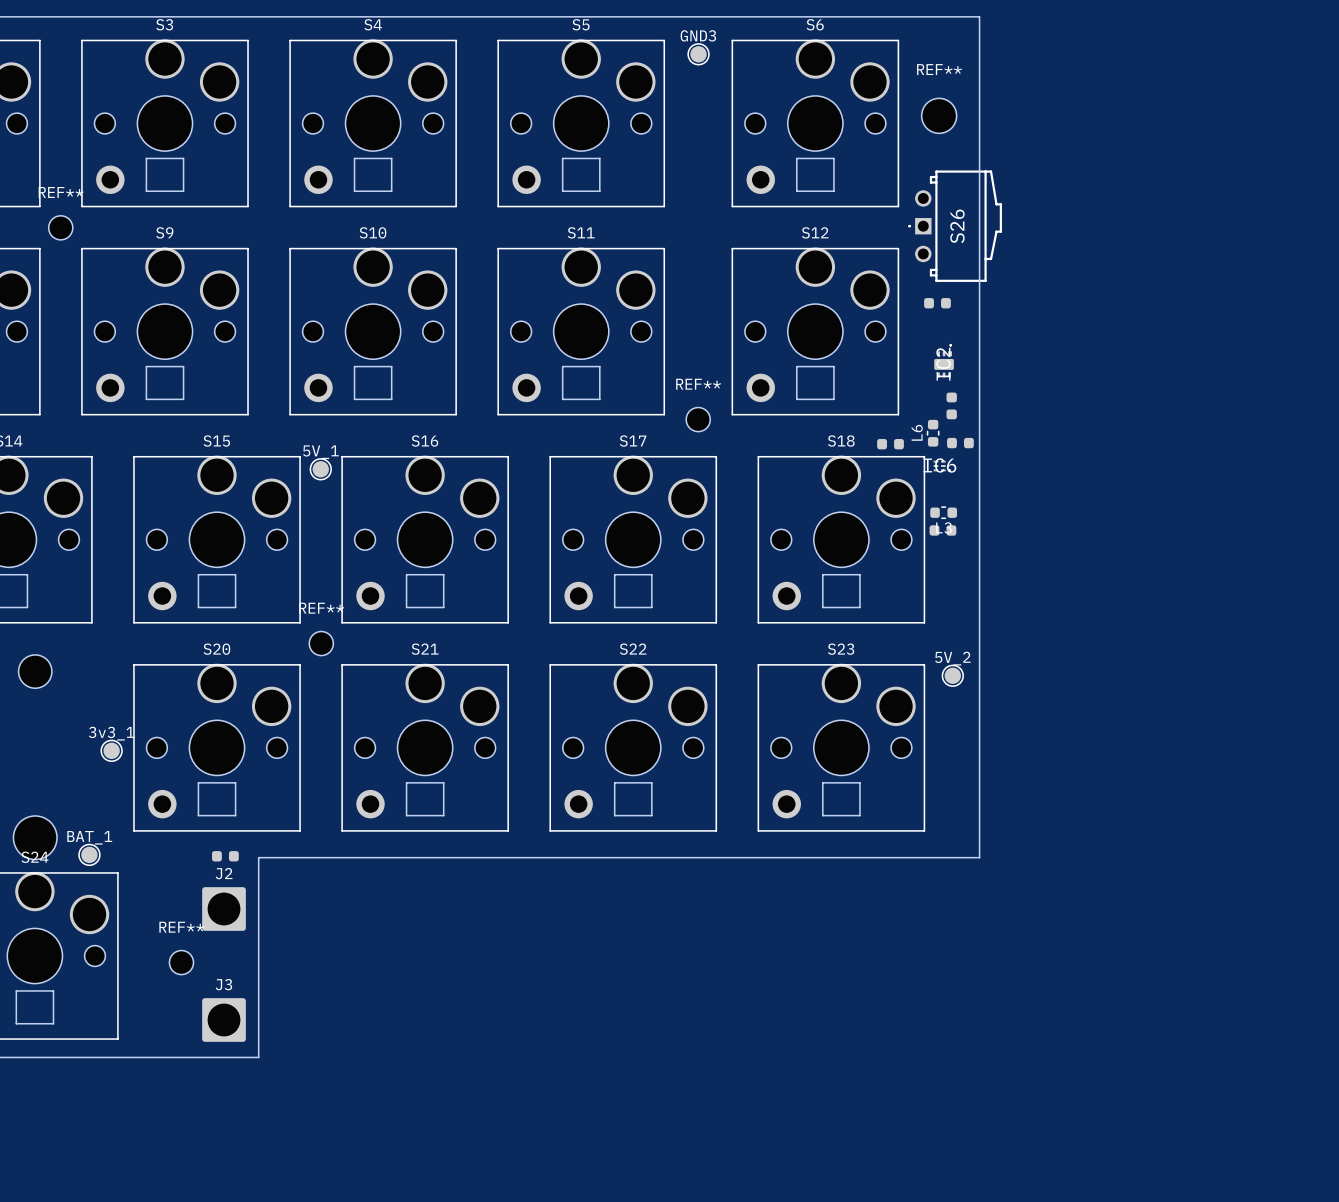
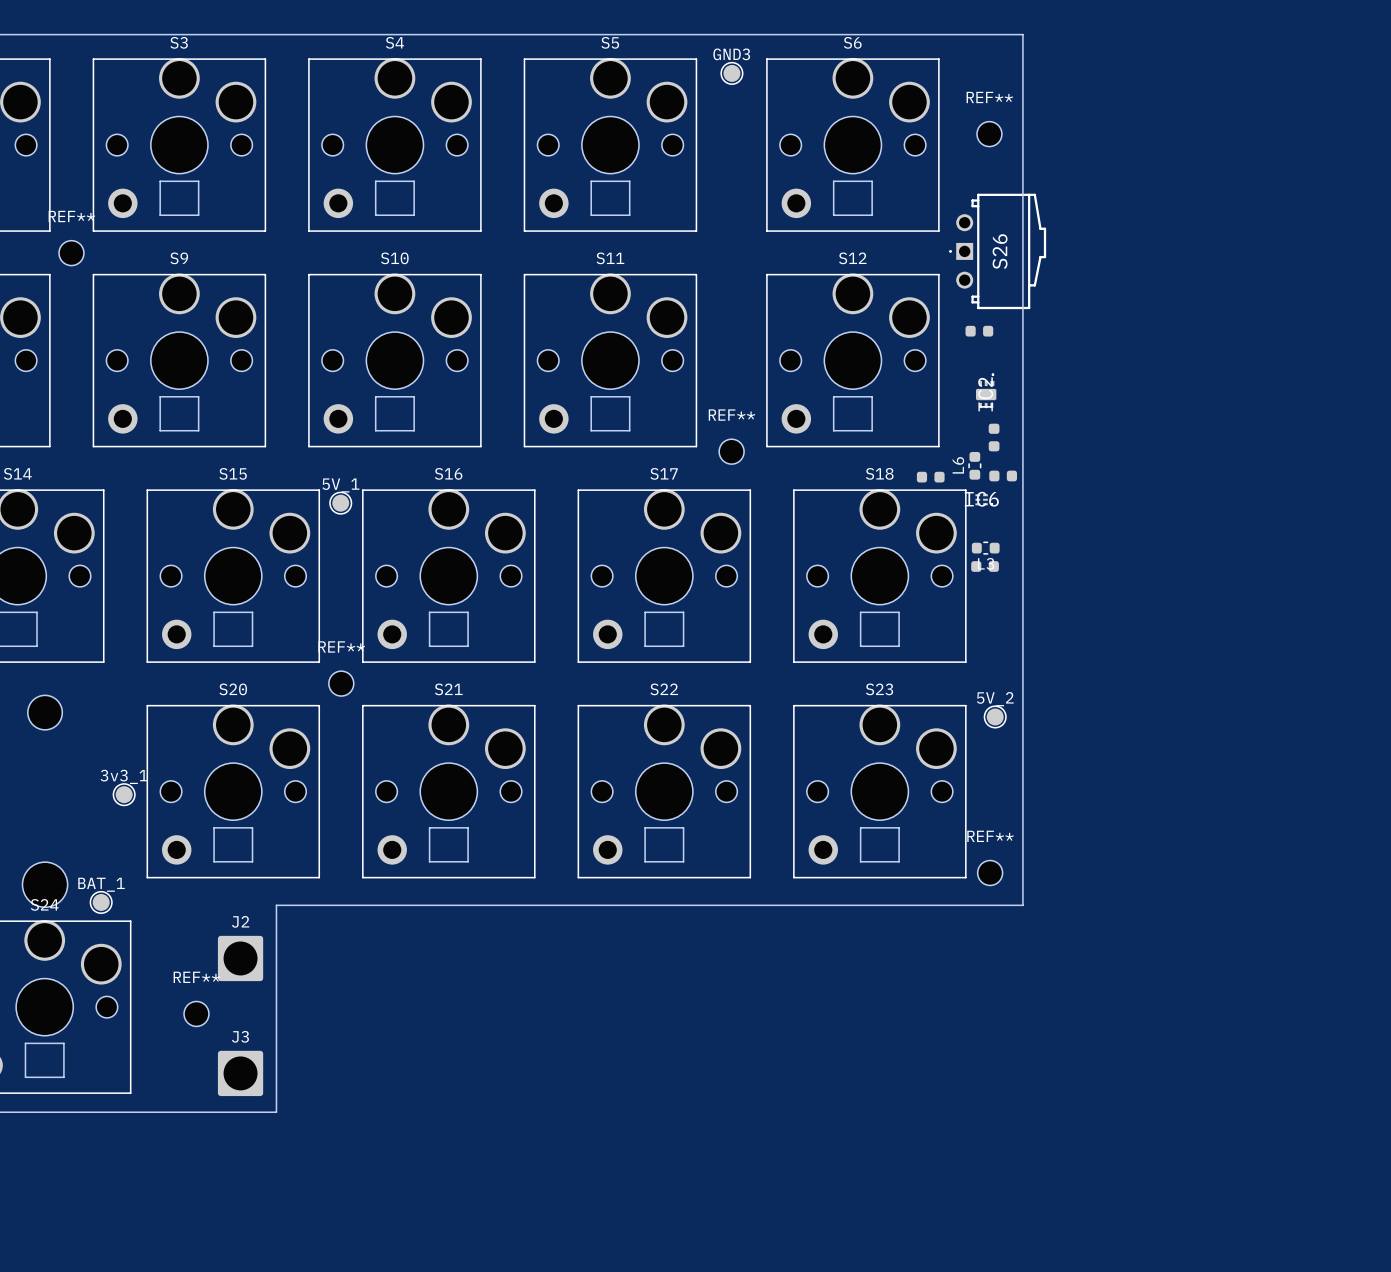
REF** footprint: [921, 98, 957, 134] -> [977, 121, 1002, 147]
REF**: none -> (990, 872)
part: (225, 856) -> none

